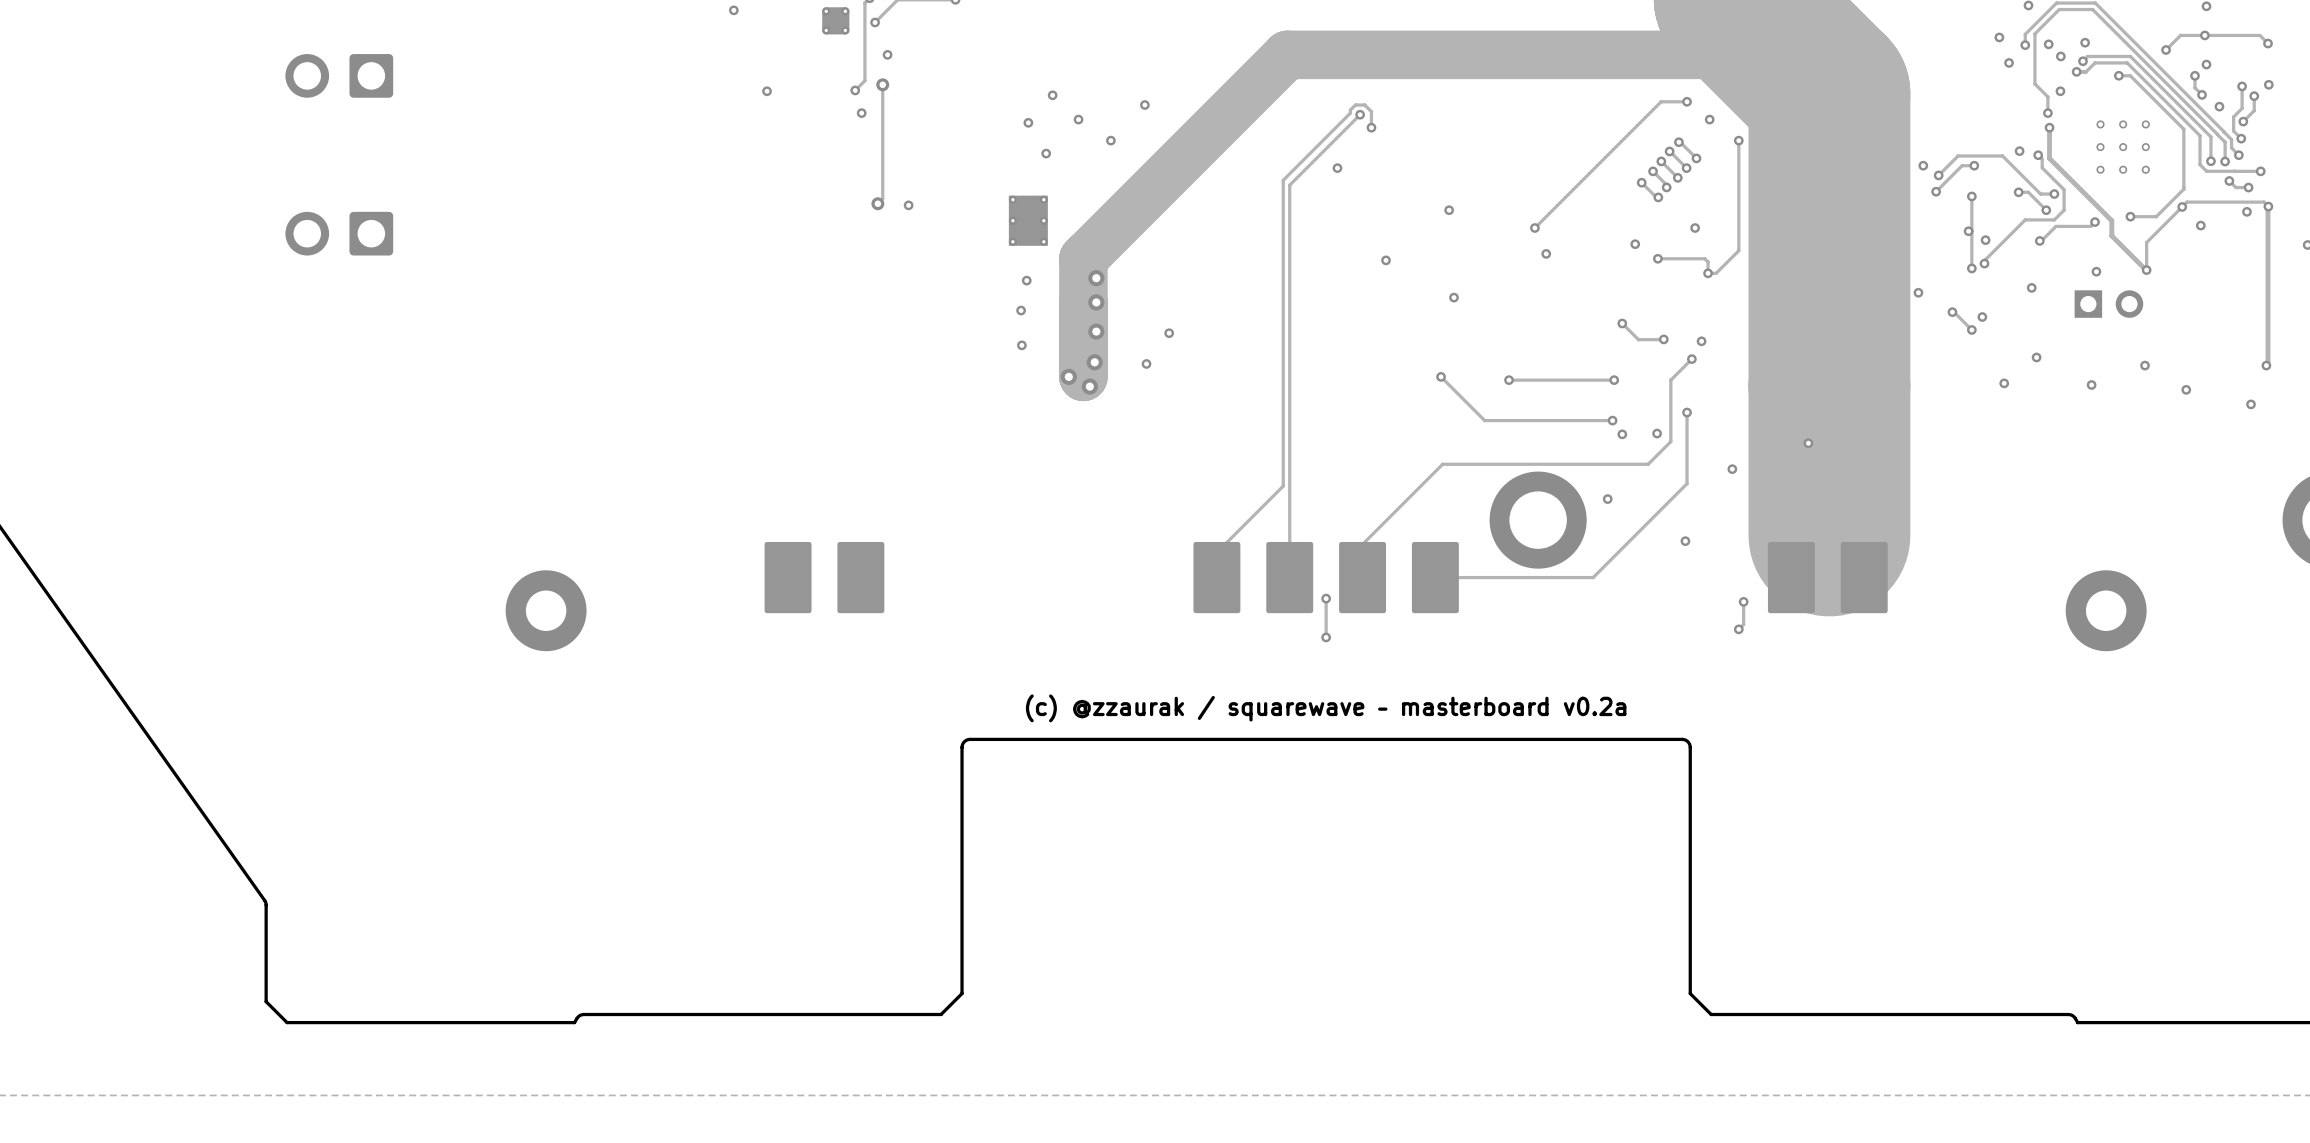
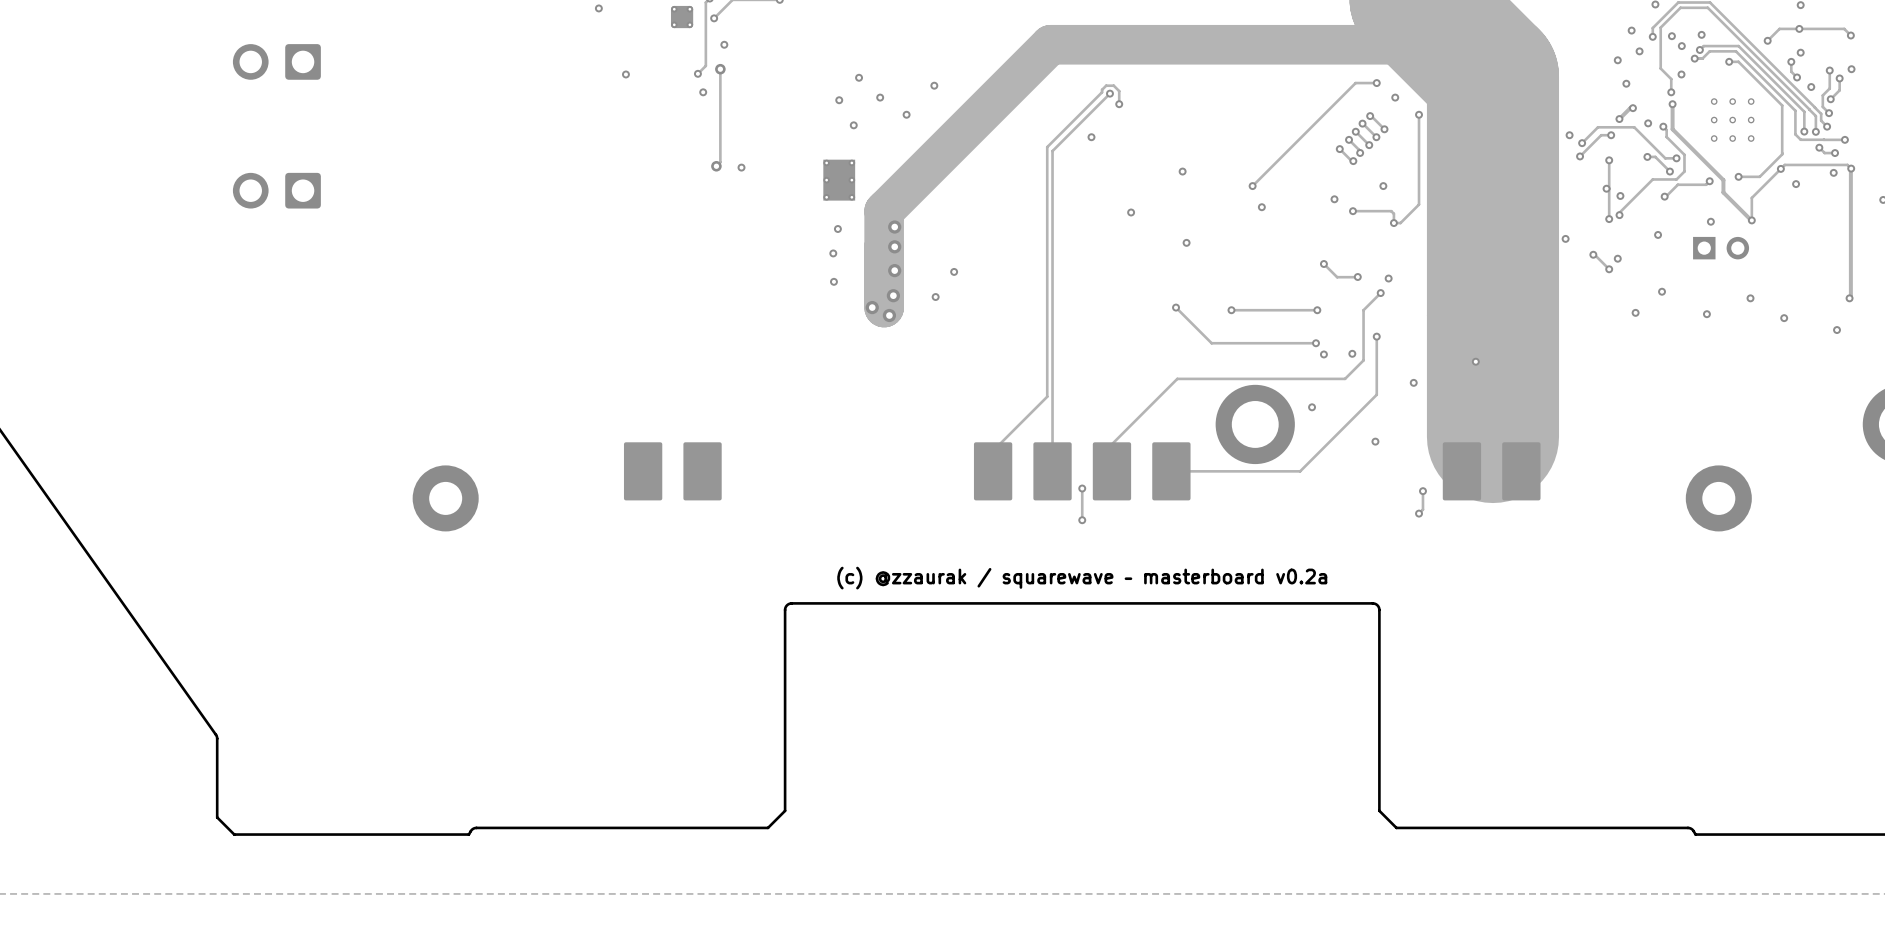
via: none -> (1617, 60)
via: none -> (1626, 83)
track: none -> (1632, 108) (1630, 108) (1619, 119)
via: none -> (1632, 108)
via: none -> (1619, 119)

